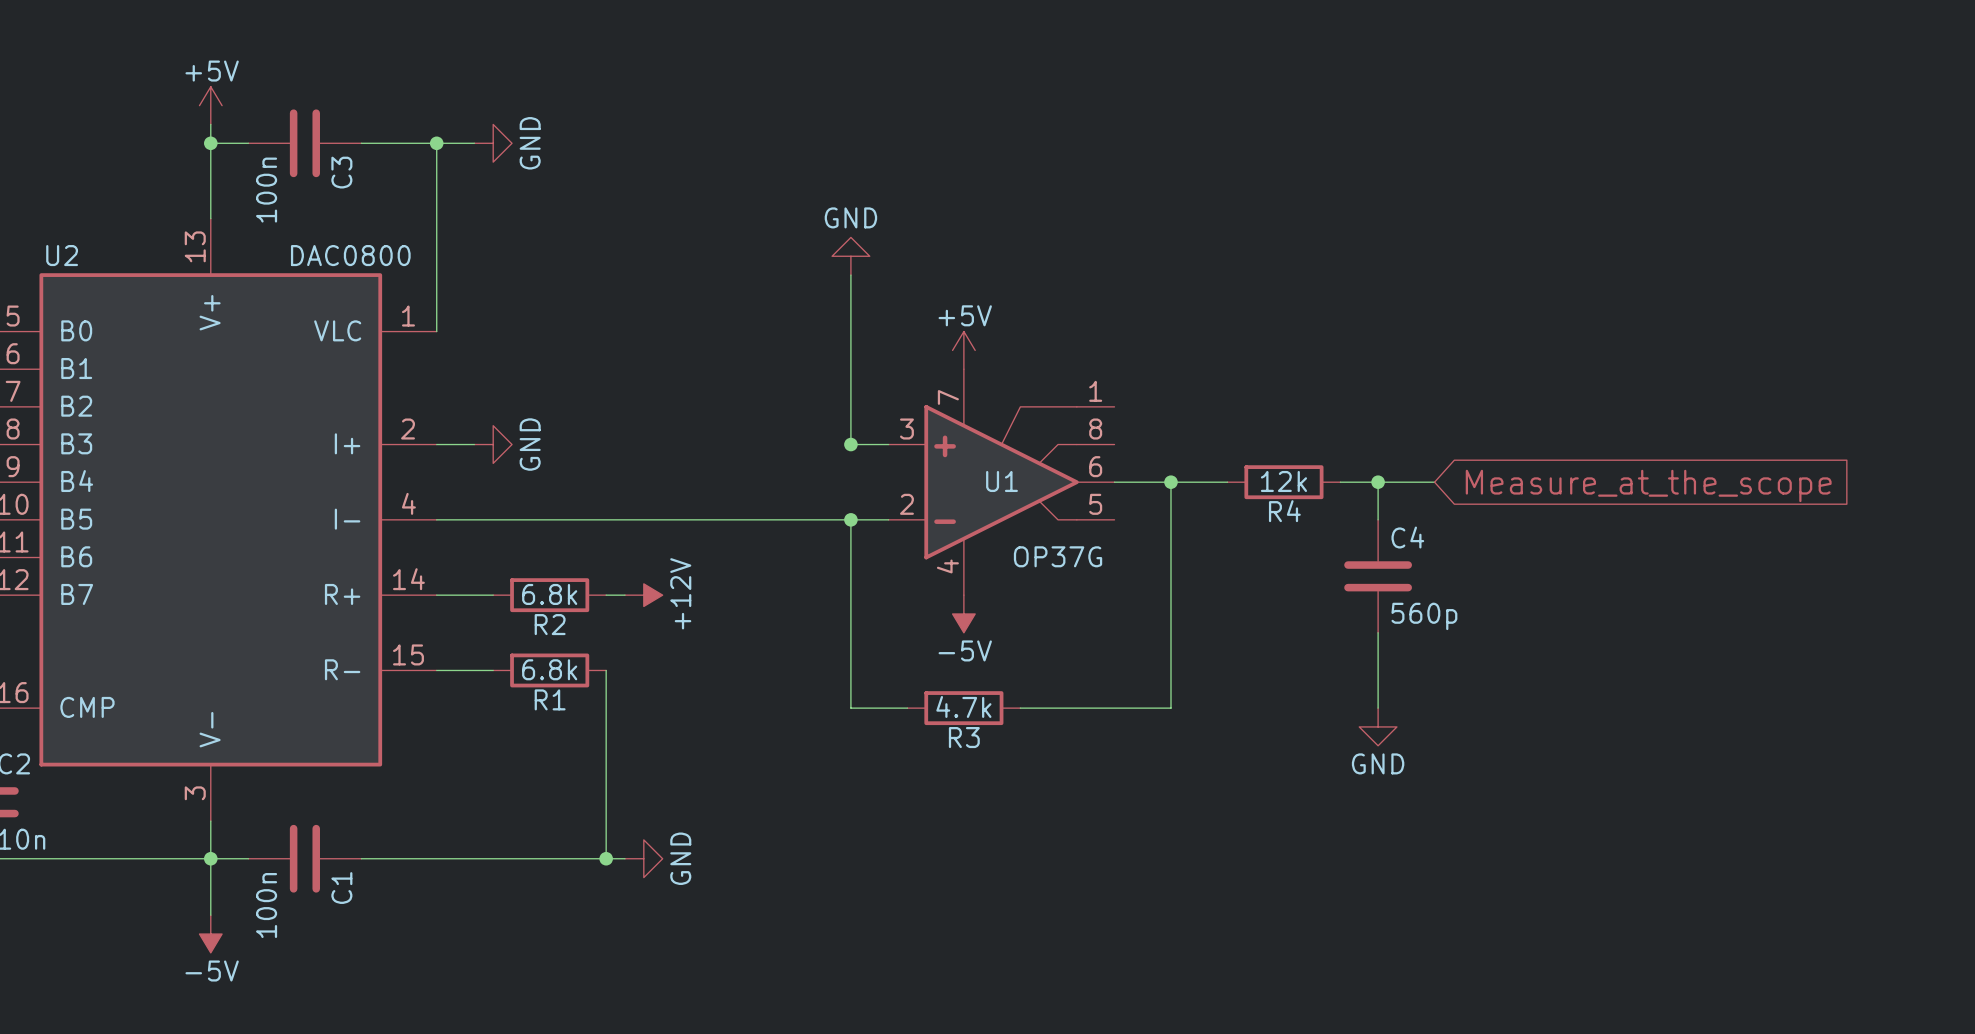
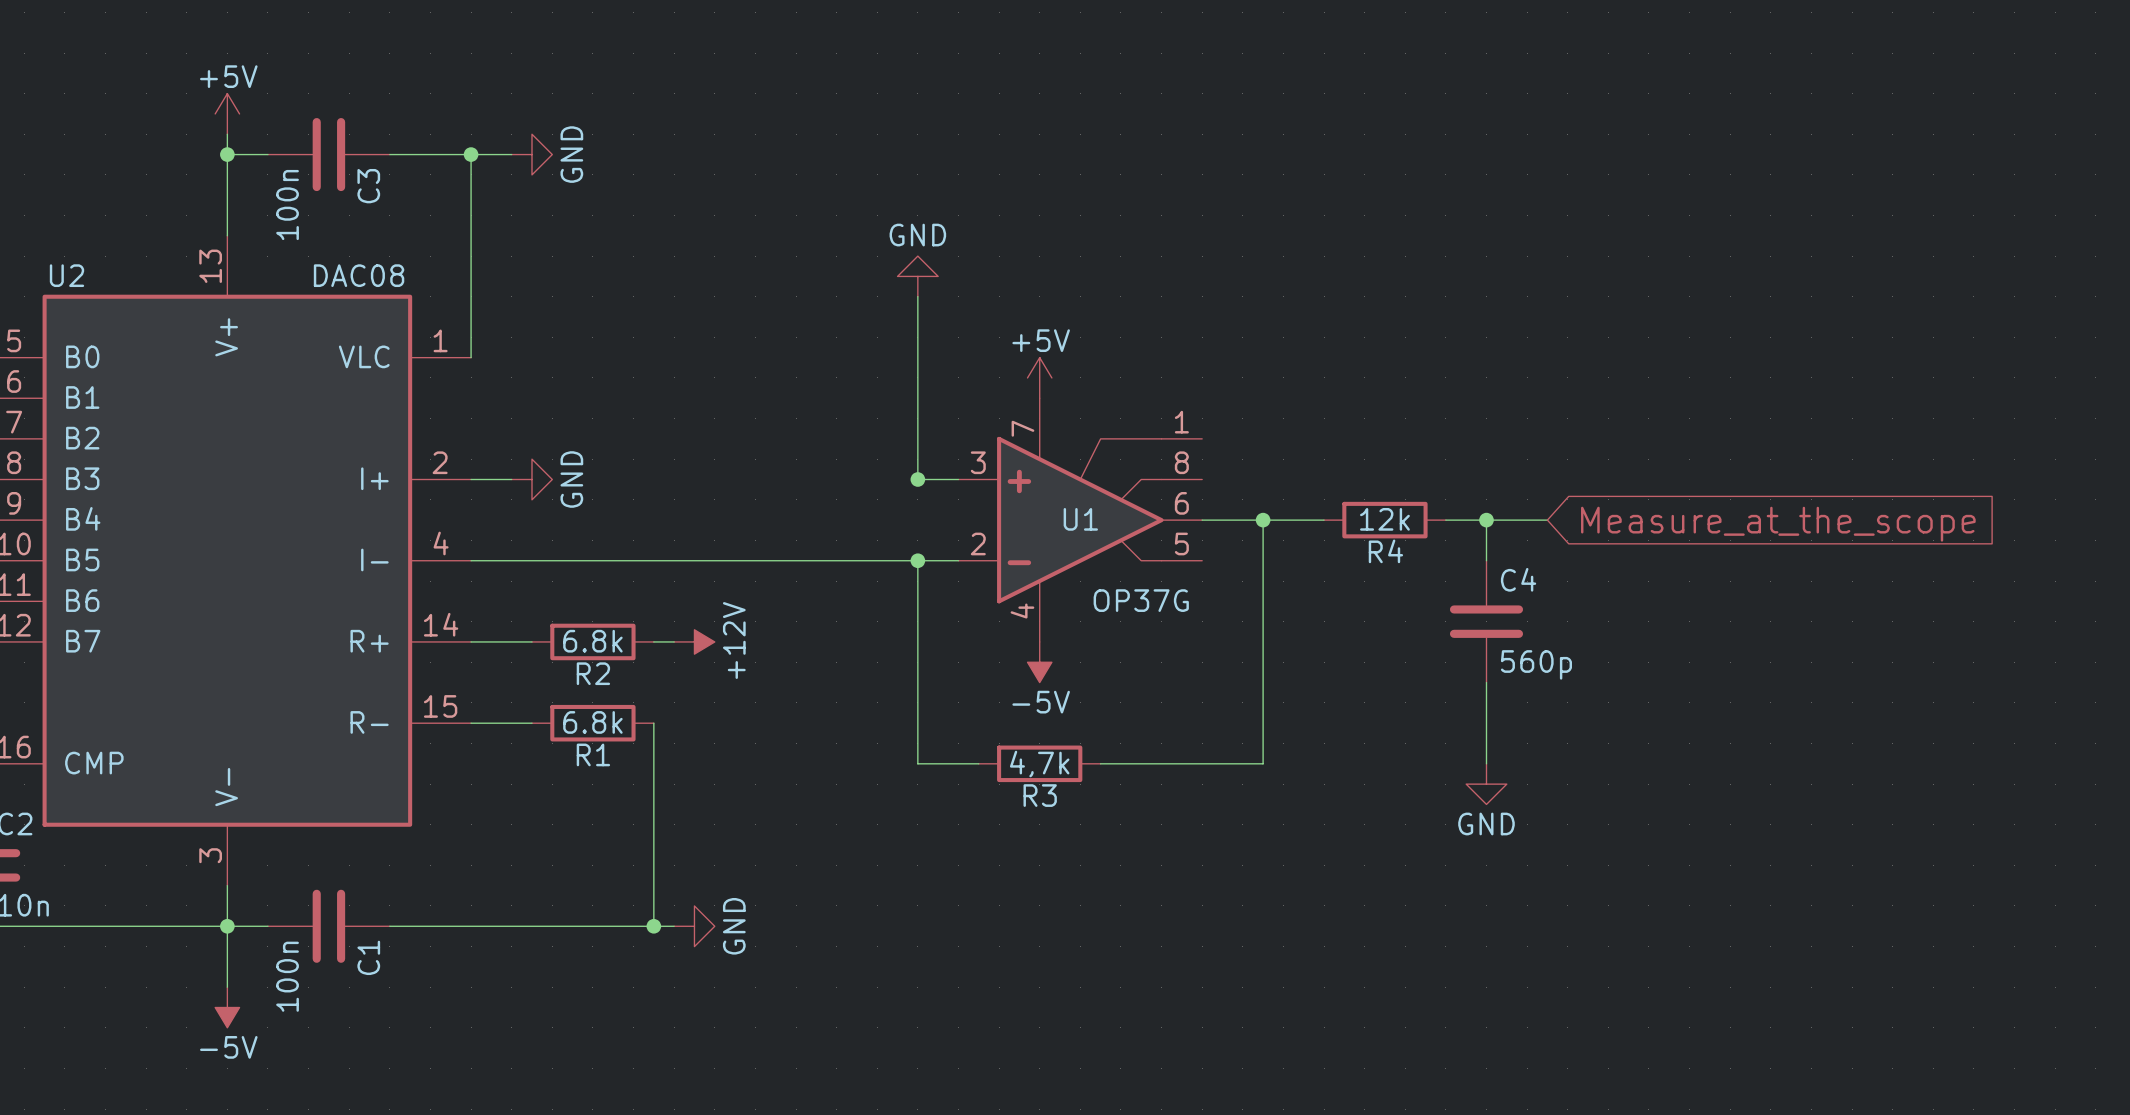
U2 value: DAC0800 (350, 255) -> DAC08 (359, 275)
R3 value: 4.7k (963, 706) -> 4,7k (1039, 764)

